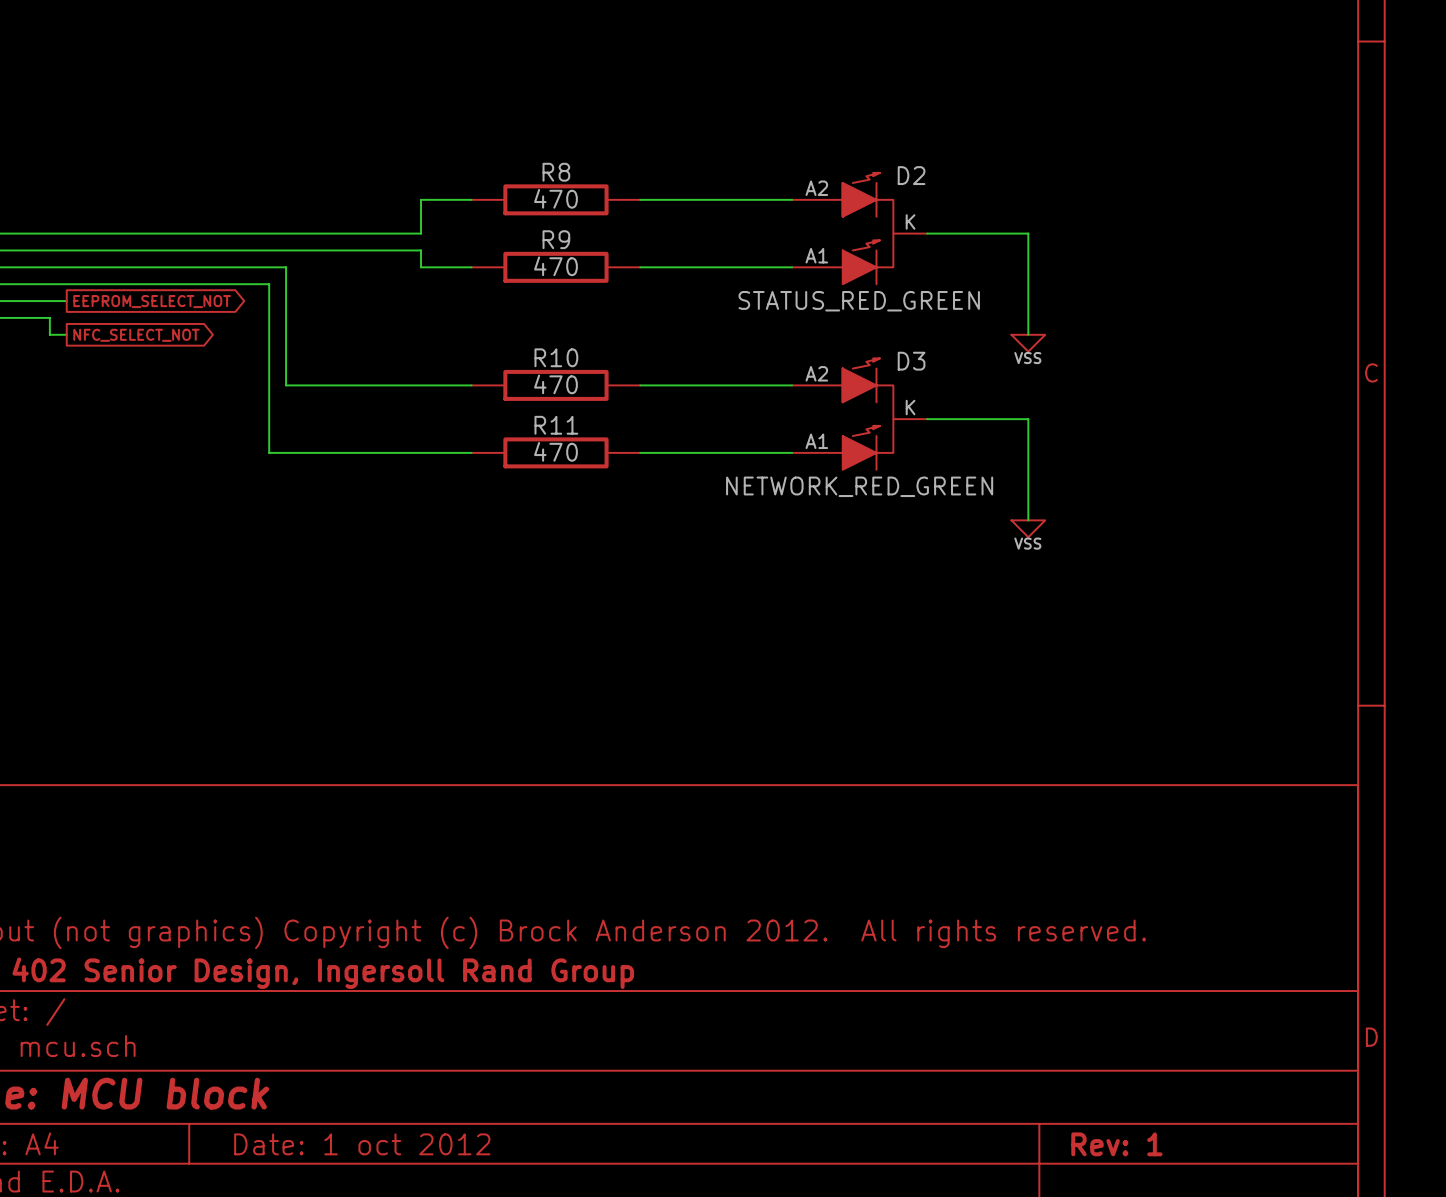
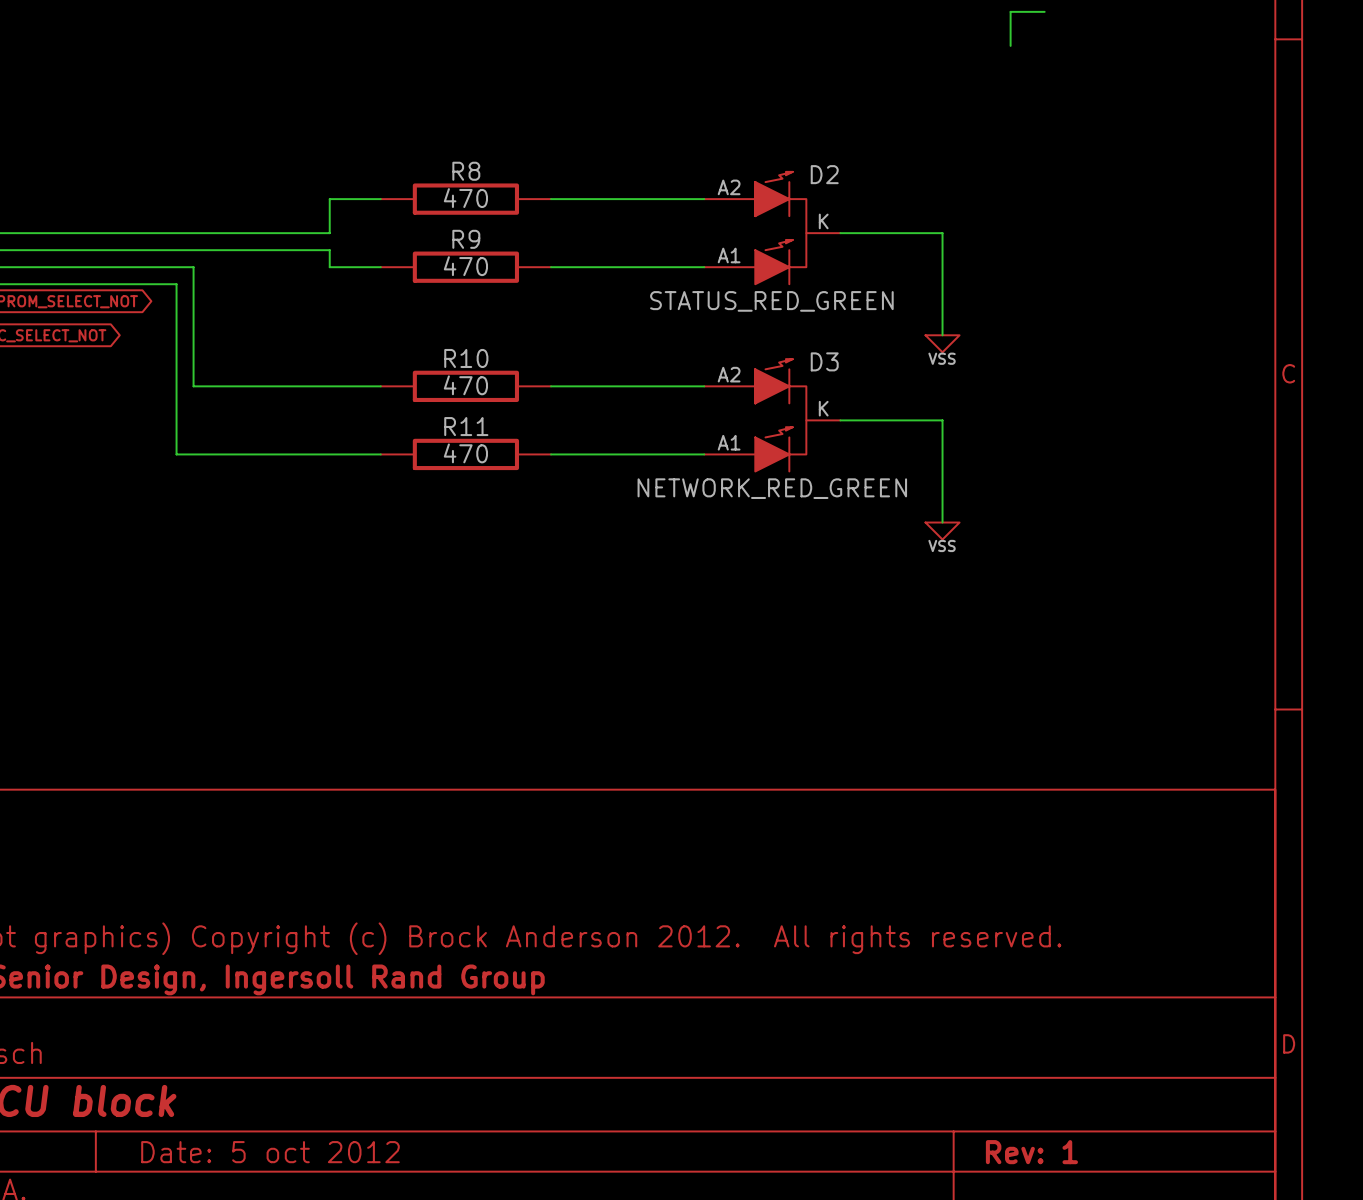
wire: none -> (1044, 11) (1010, 11) (1010, 45)
title block: Date: 1 oct 2012 (362, 1144) -> Date: 5 oct 2012 (270, 1152)

